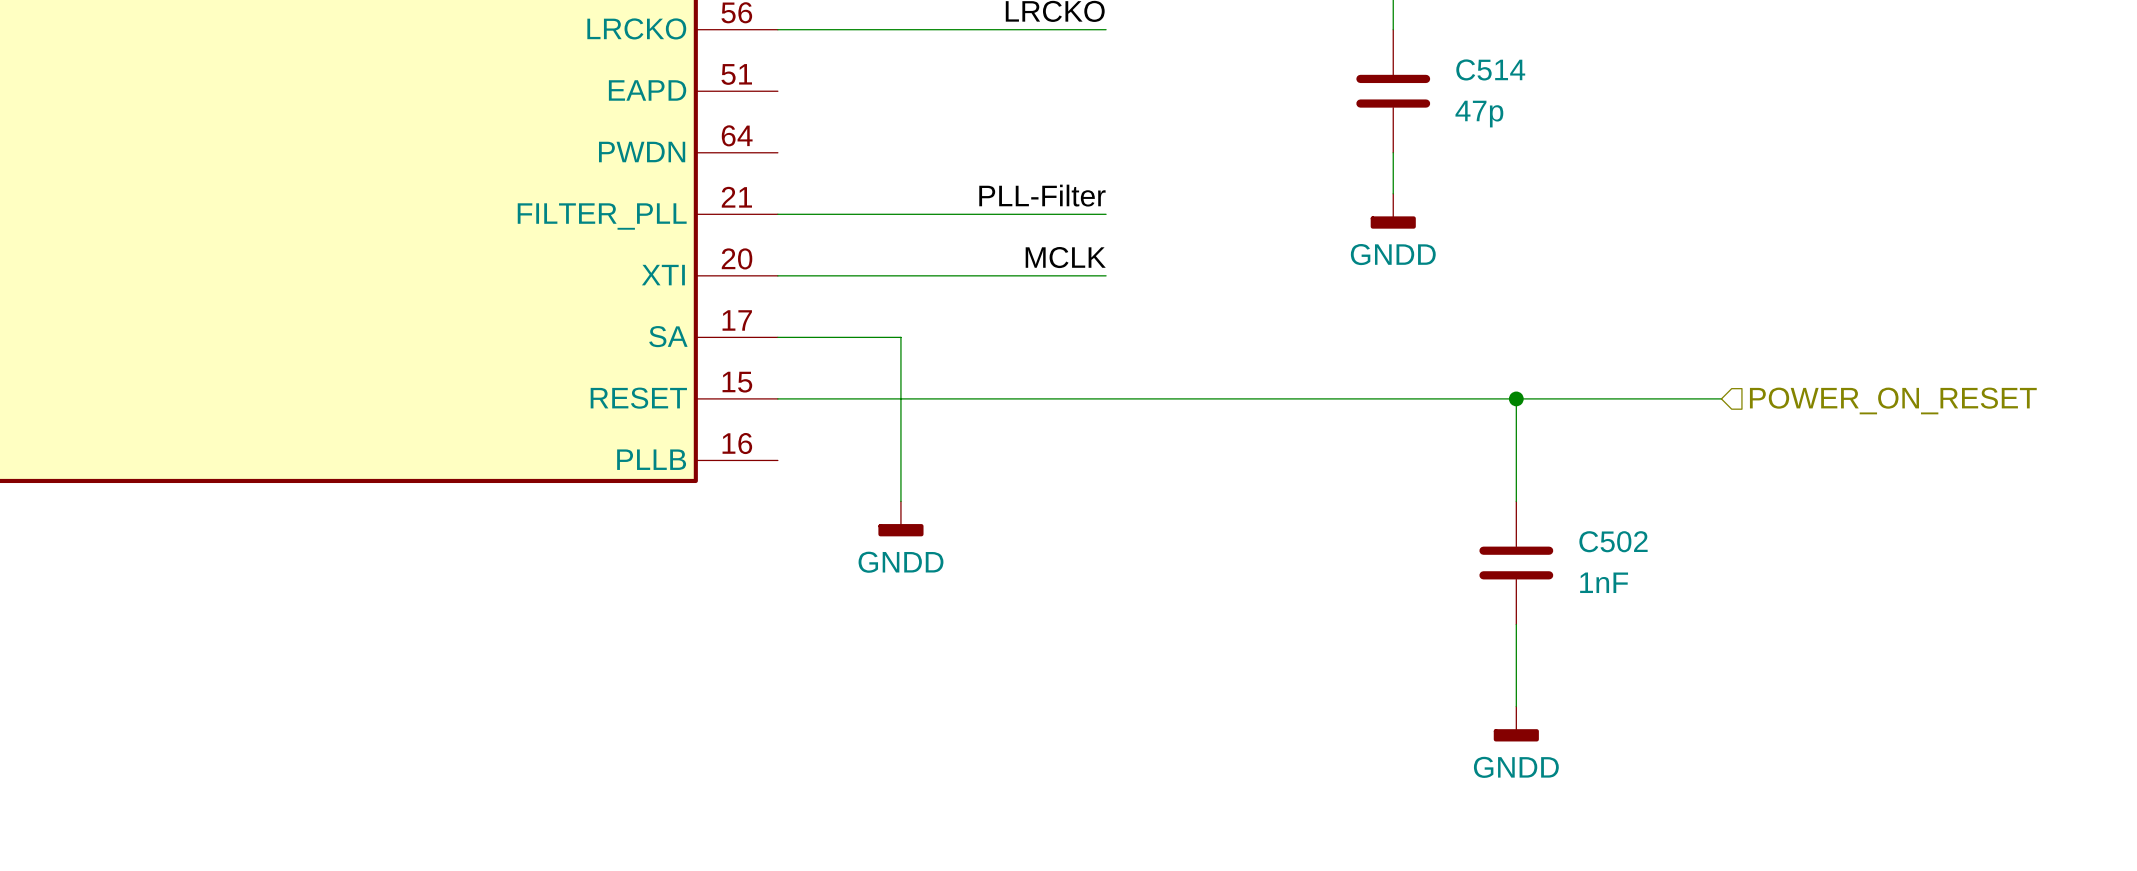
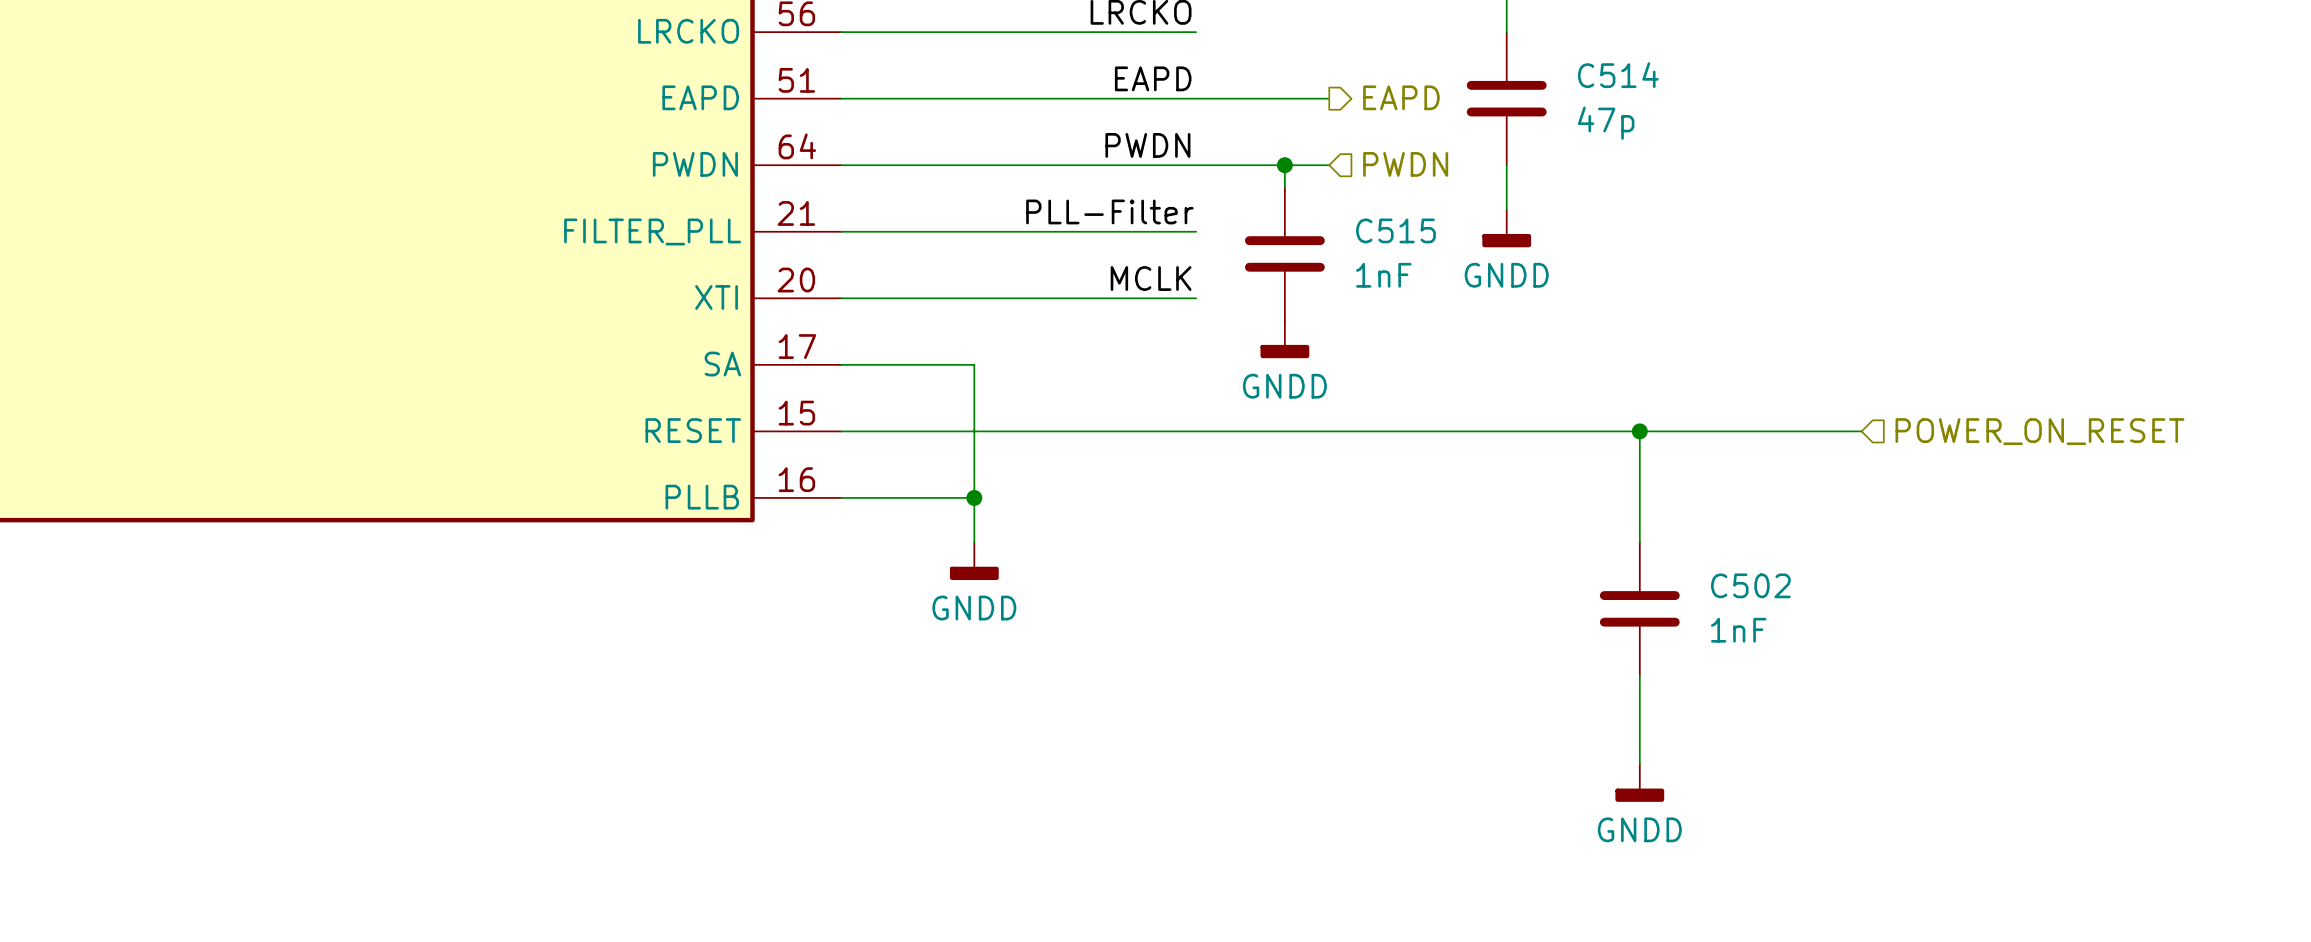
label: none -> EAPD (1153, 78)
hierarchical label: none -> EAPD (1401, 97)
wire: none -> (841, 98) (1329, 98)
label: none -> PWDN (1147, 145)
wire: none -> (841, 165) (1329, 165)
wire: none -> (1284, 165) (1284, 187)
junction: none -> (1284, 165)
hierarchical label: none -> PWDN (1405, 164)
C515: none -> 1nF (1284, 253)
power symbol: none -> GNDD (1284, 339)
wire: none -> (841, 497) (974, 497)
junction: none -> (974, 497)

